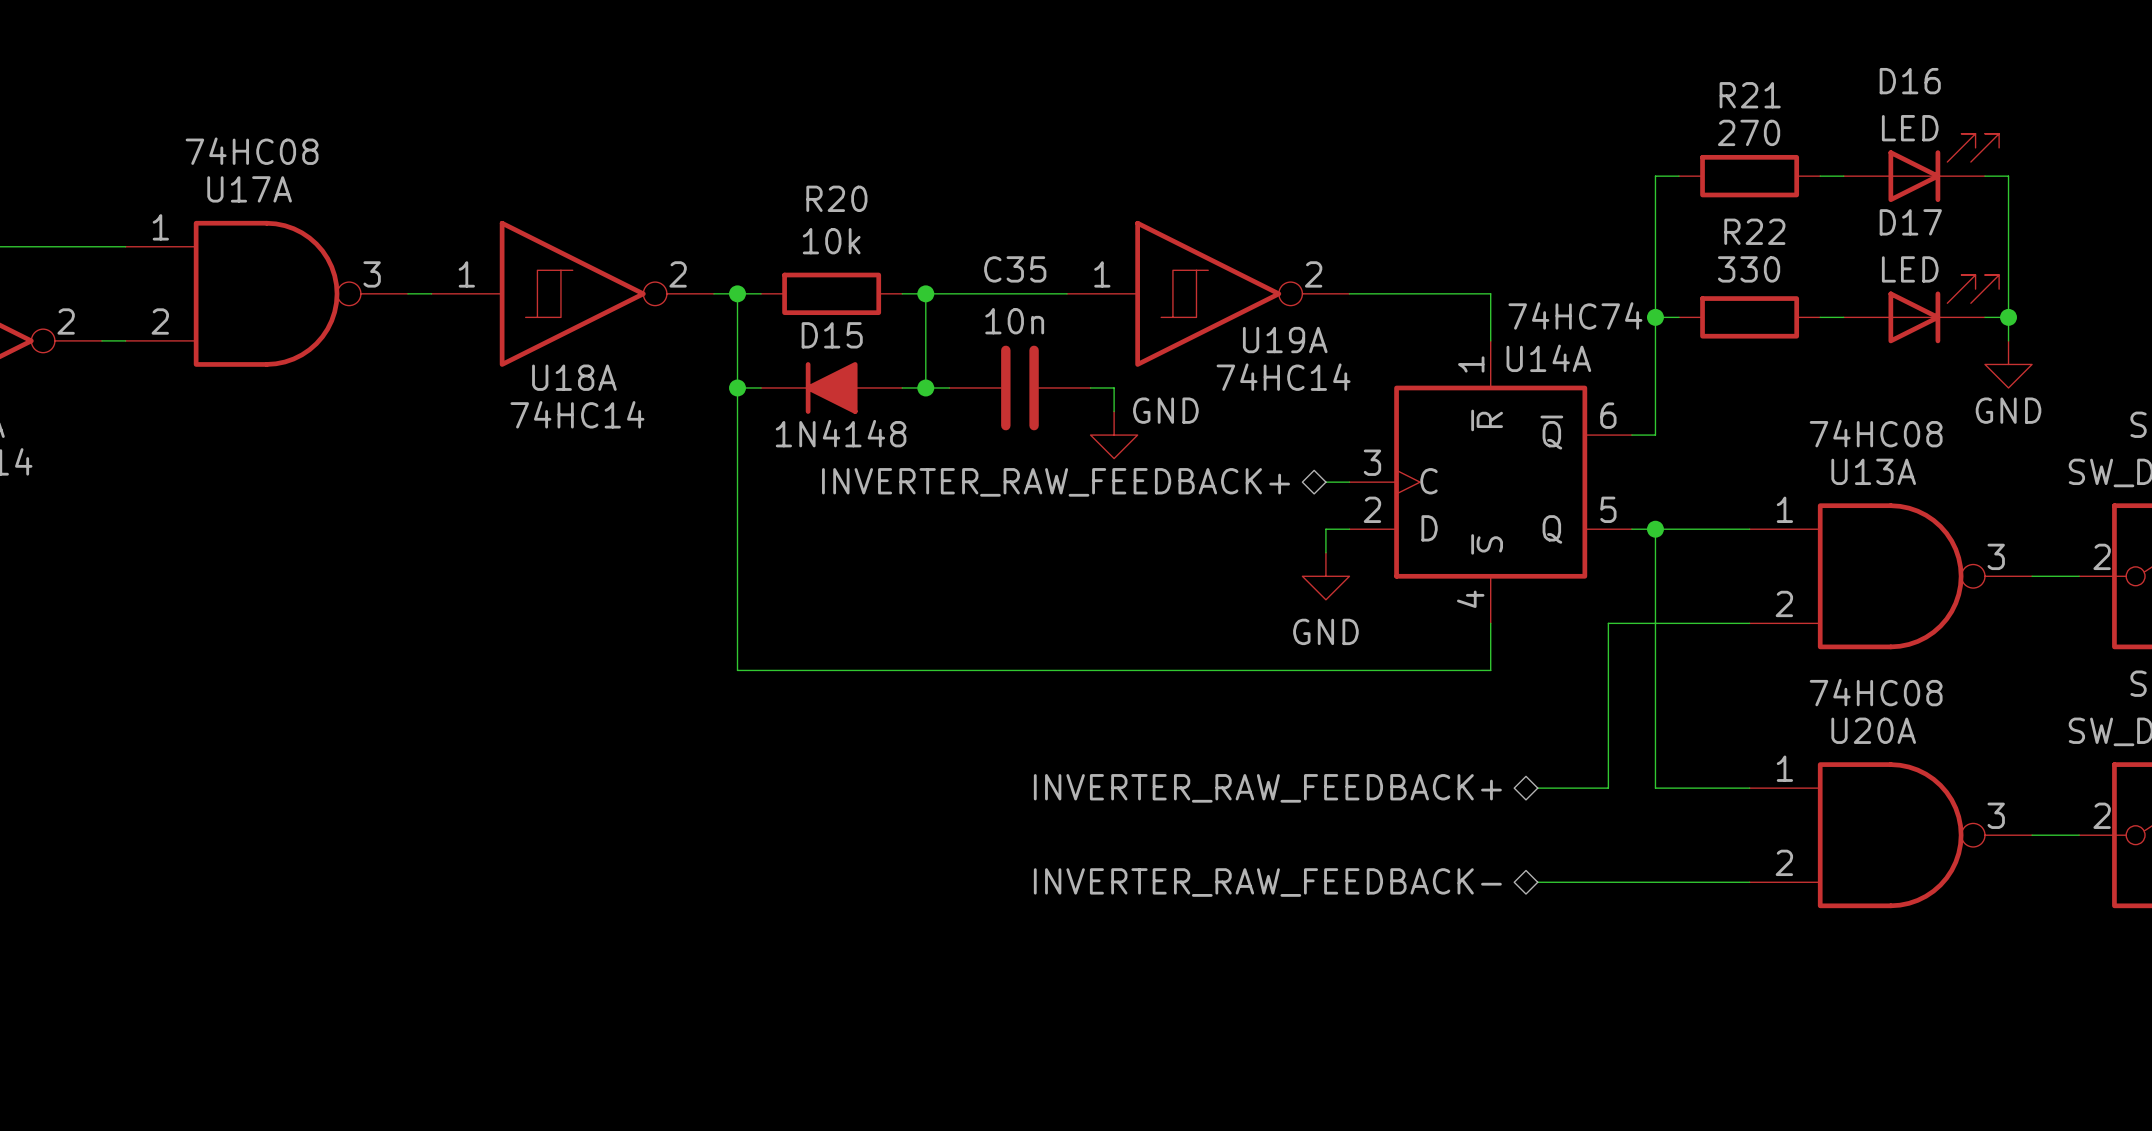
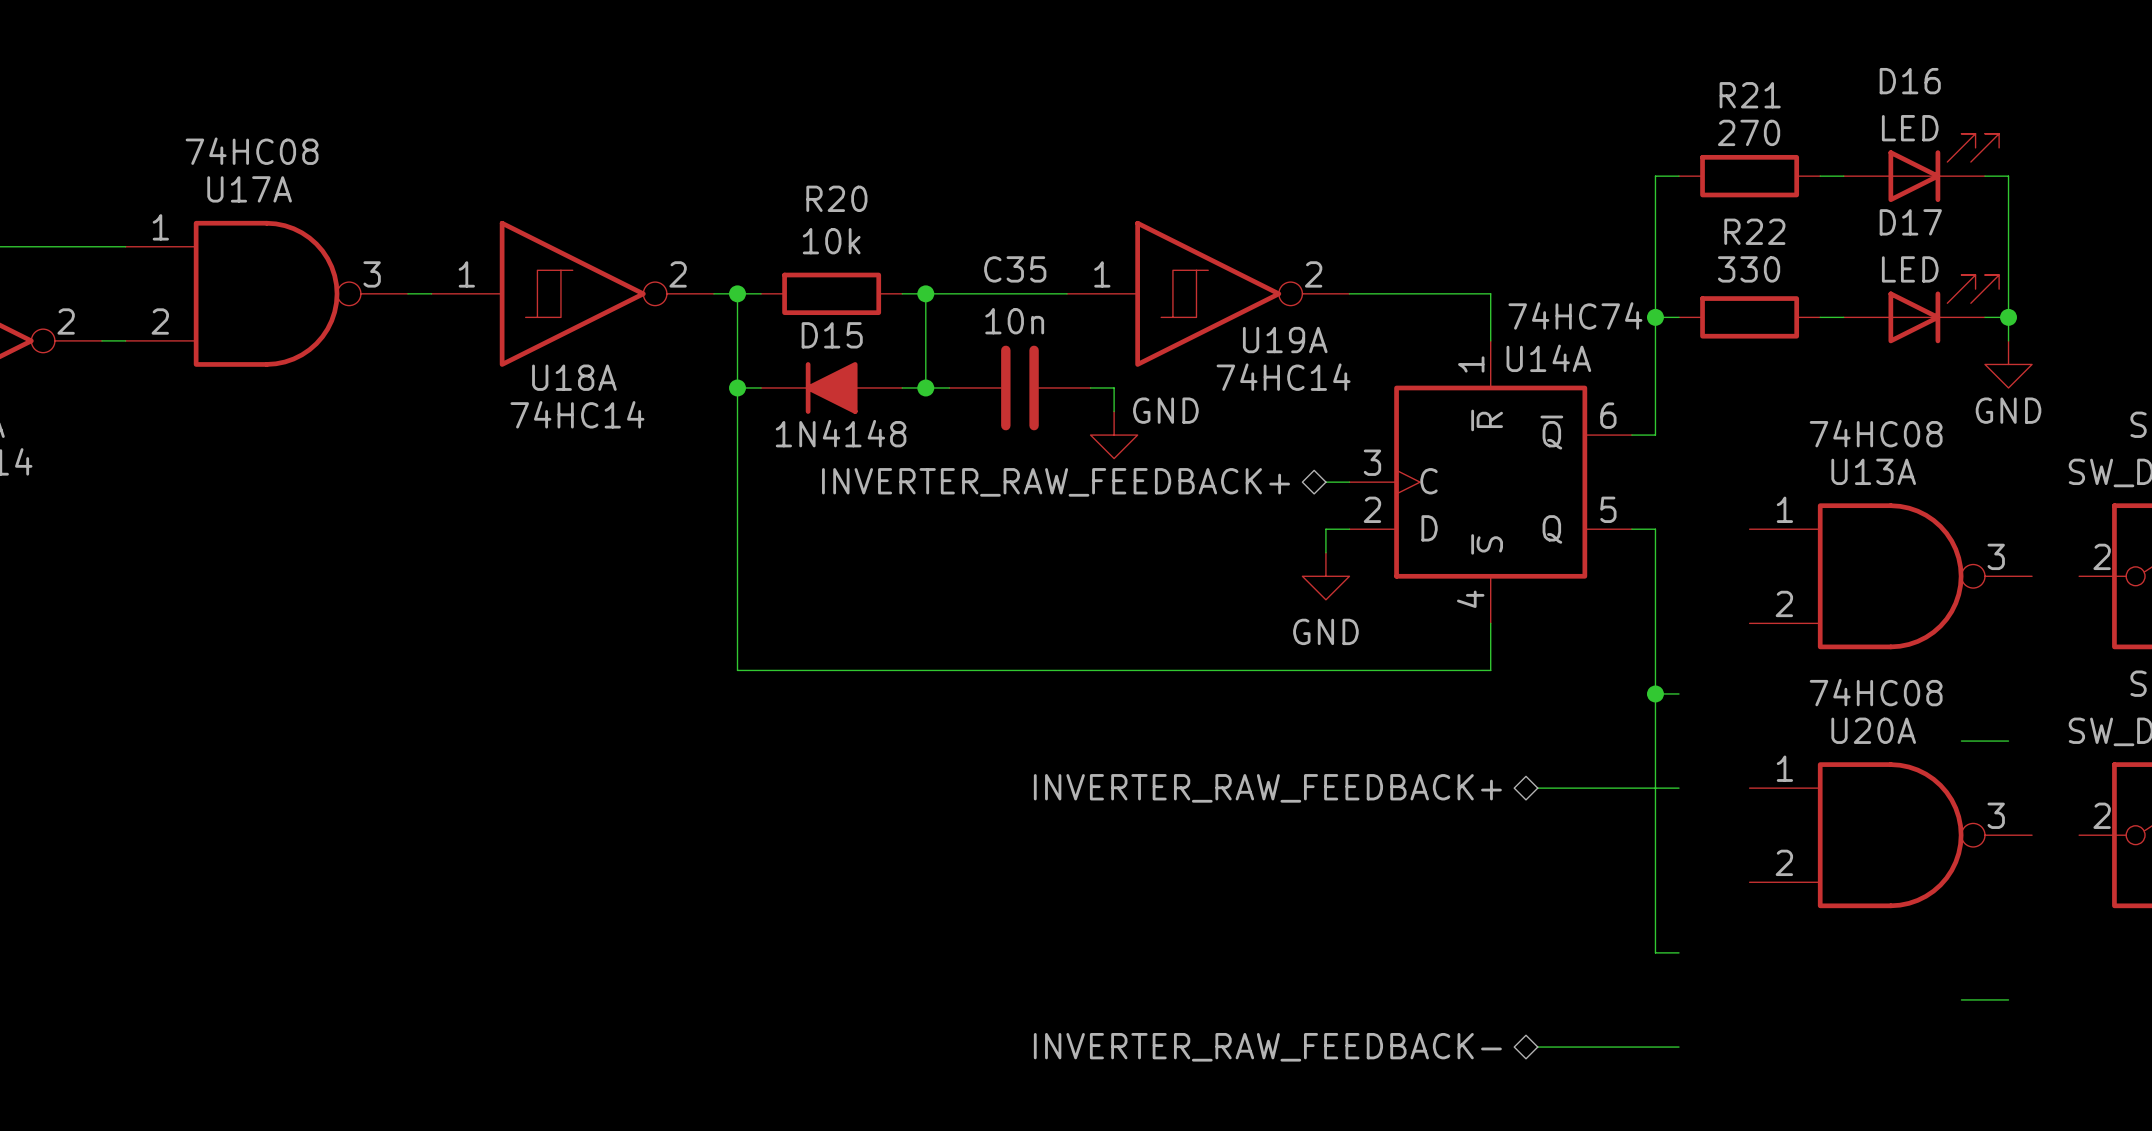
wire: (1655, 529) (1749, 529) -> none
junction: (1655, 529) -> none
wire: (2032, 576) (2079, 576) -> (1961, 741) (2008, 741)
wire: (1749, 623) (1608, 623) (1608, 788) -> (1679, 952) (1655, 952) (1655, 788) (1608, 788)
wire: none -> (1655, 693) (1679, 693)
junction: none -> (1655, 693)
wire: (1679, 788) (1749, 788) -> none
wire: (2032, 835) (2079, 835) -> (1961, 999) (2008, 999)
hierarchical label position: INVERTER_RAW_FEEDBACK- (1267, 882) -> INVERTER_RAW_FEEDBACK- (1267, 1047)
wire: (1537, 882) (1749, 882) -> none
wire: none -> (1537, 1047) (1679, 1047)

